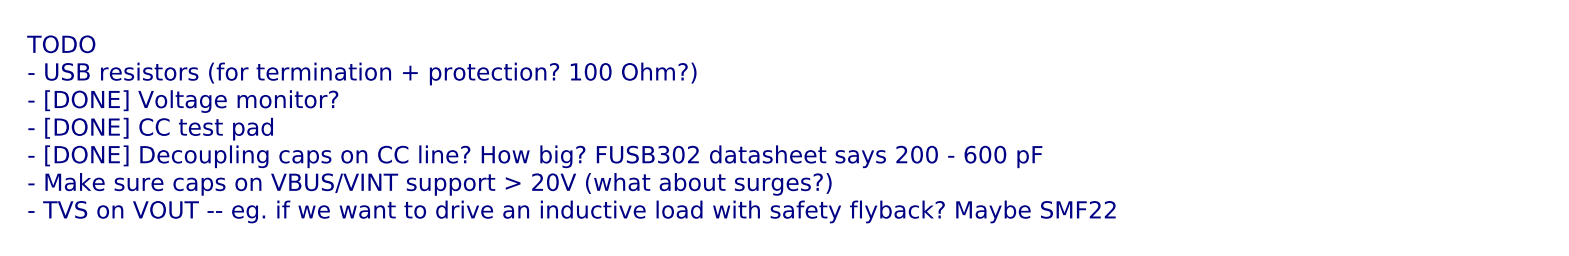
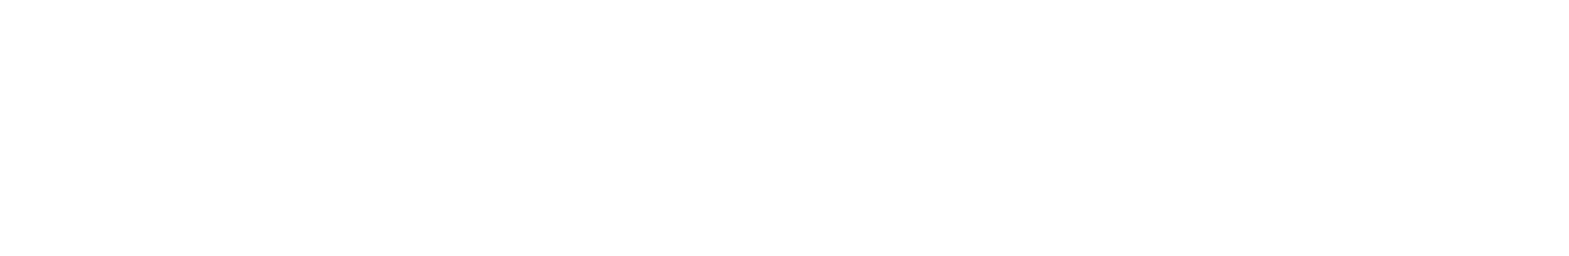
text: TODO (61, 44) -> none
text: - USB resistors (for termination + protection? 100 Ohm?) (362, 73) -> none
text: - [DONE] Voltage monitor? (183, 101) -> none
text: - [DONE] CC test pad (150, 129) -> none
text: - [DONE] Decoupling caps on CC line? How big? FUSB302 datasheet says 200 - 600 pF (535, 156) -> none
text: - Make sure caps on VBUS/VINT support > 20V (what about surges?) (430, 184) -> none
text: - TVS on VOUT -- eg. if we want to drive an inductive load with safety flyback? Maybe SMF22 (572, 211) -> none

